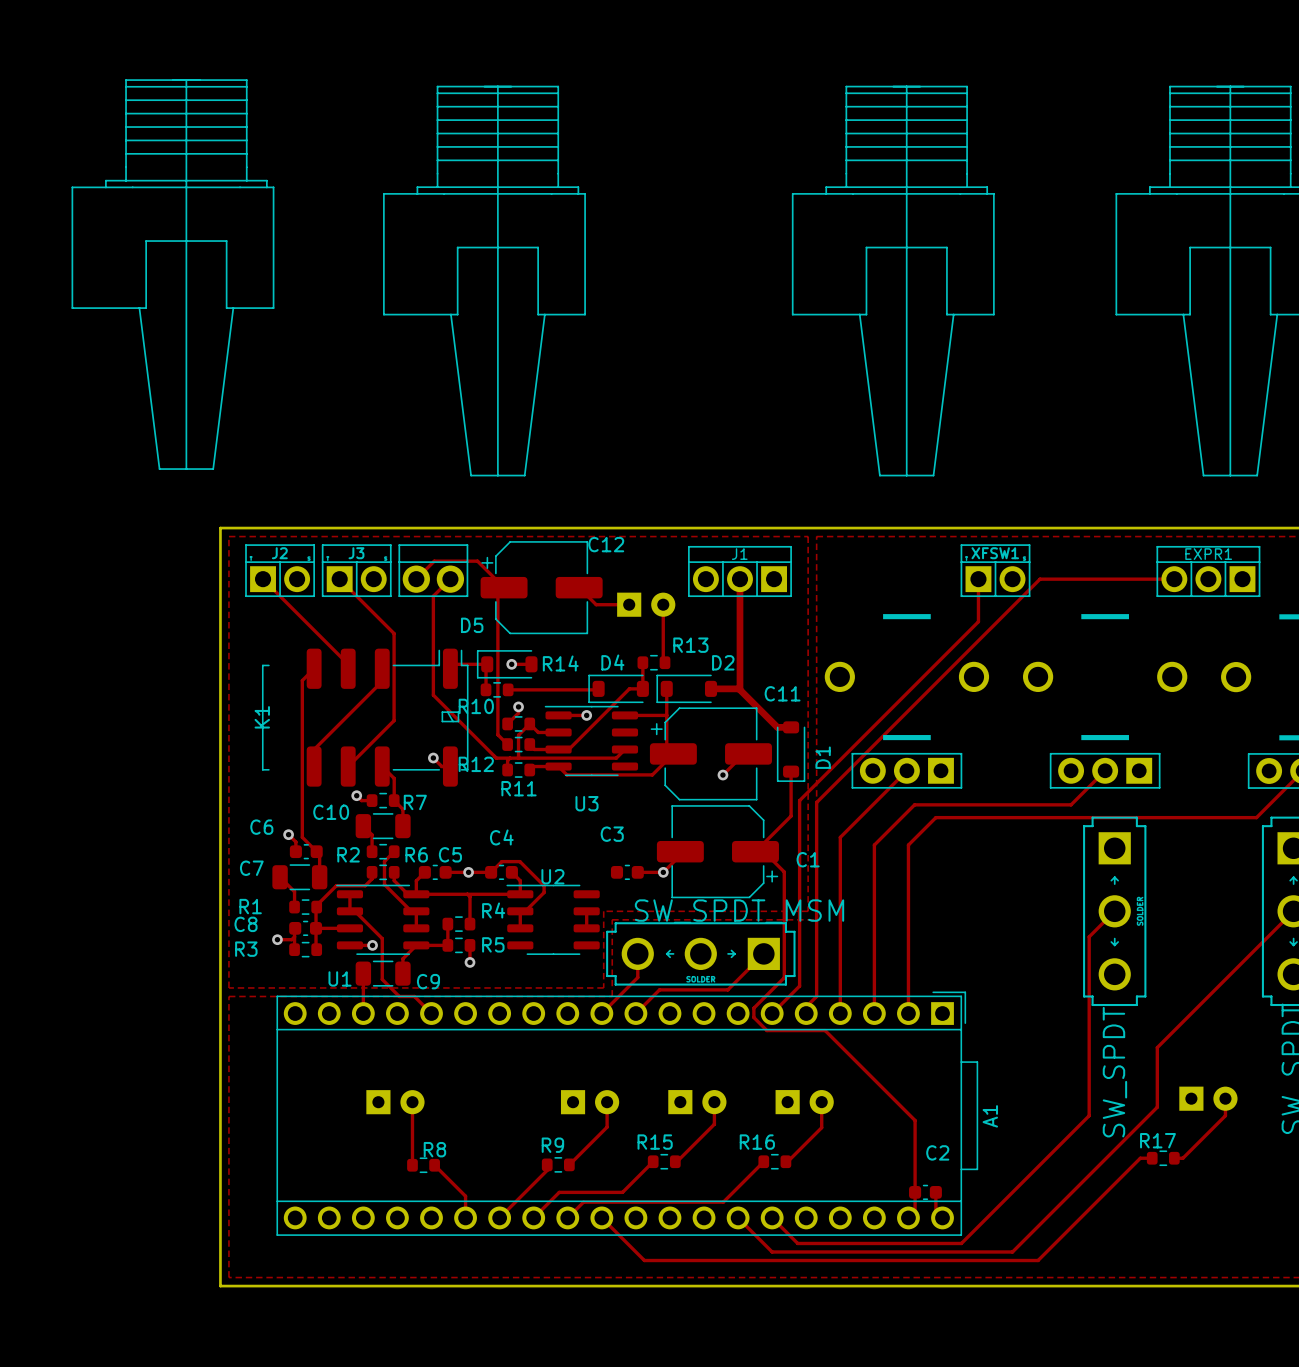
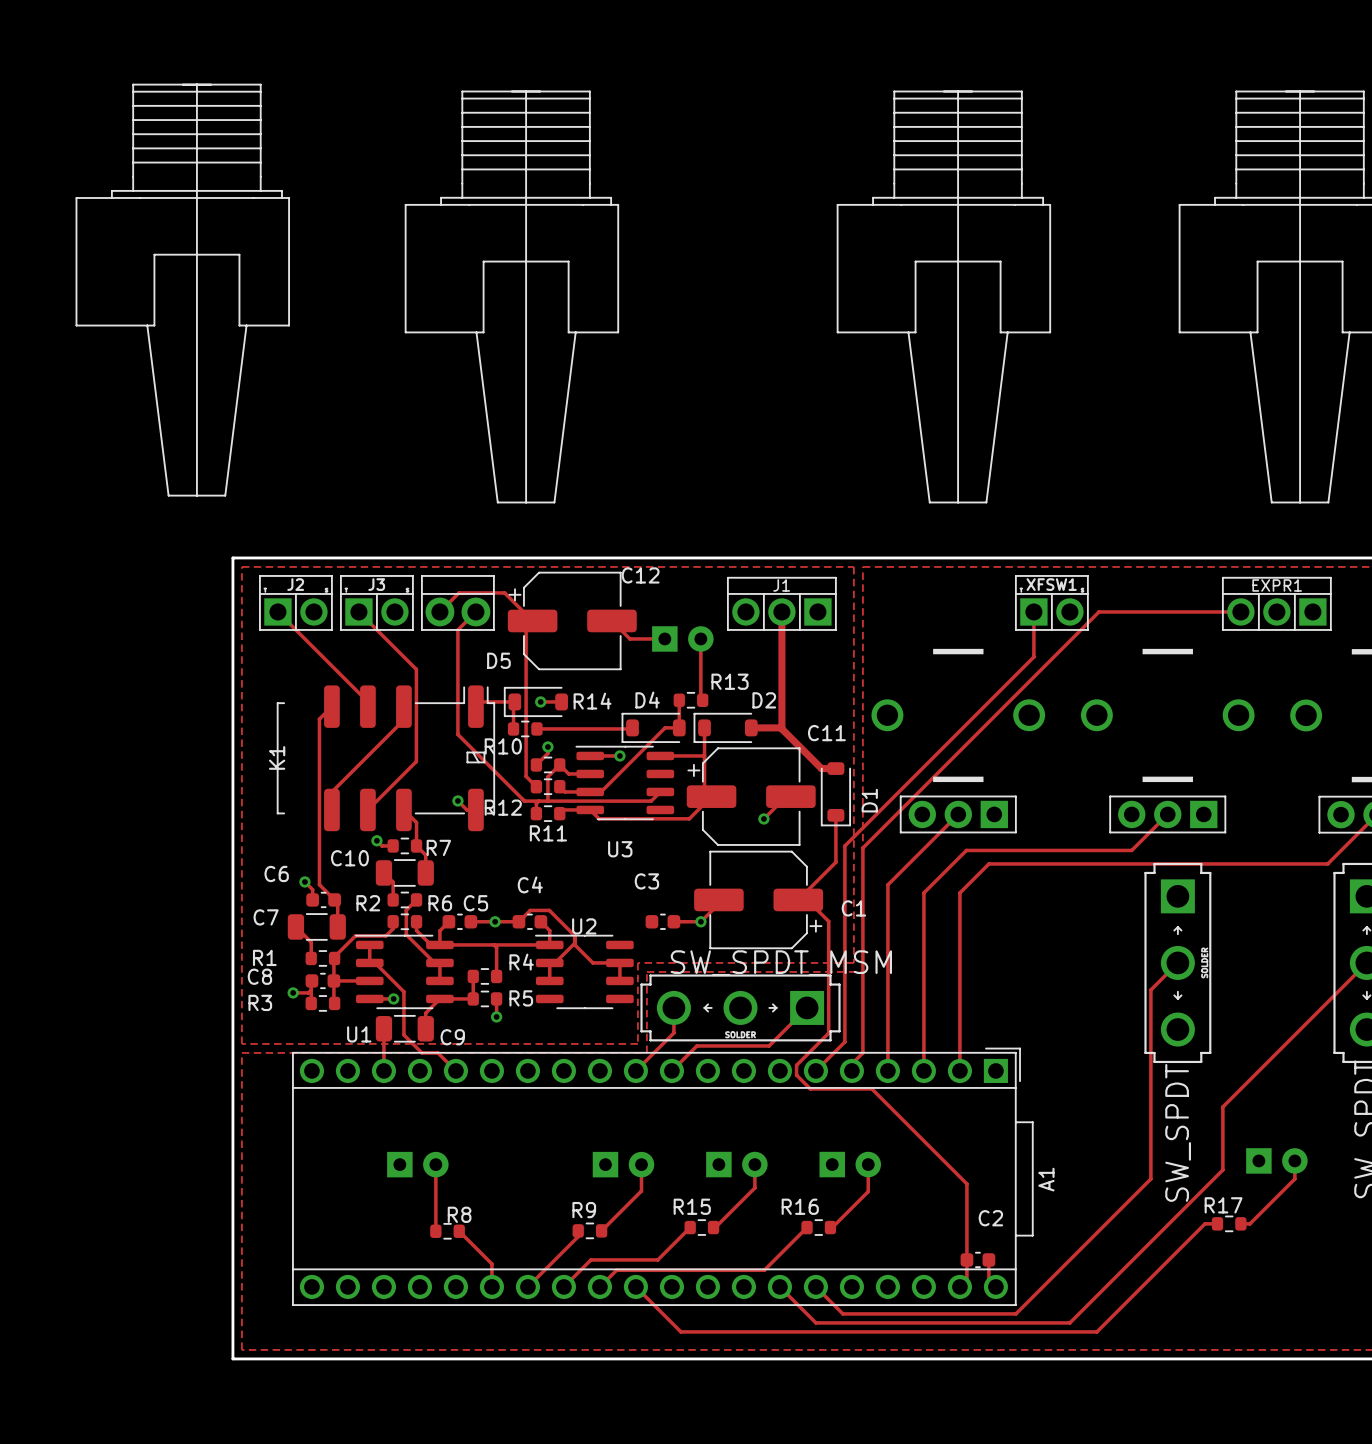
track: none -> (574, 943) (592, 962) (619, 962)

